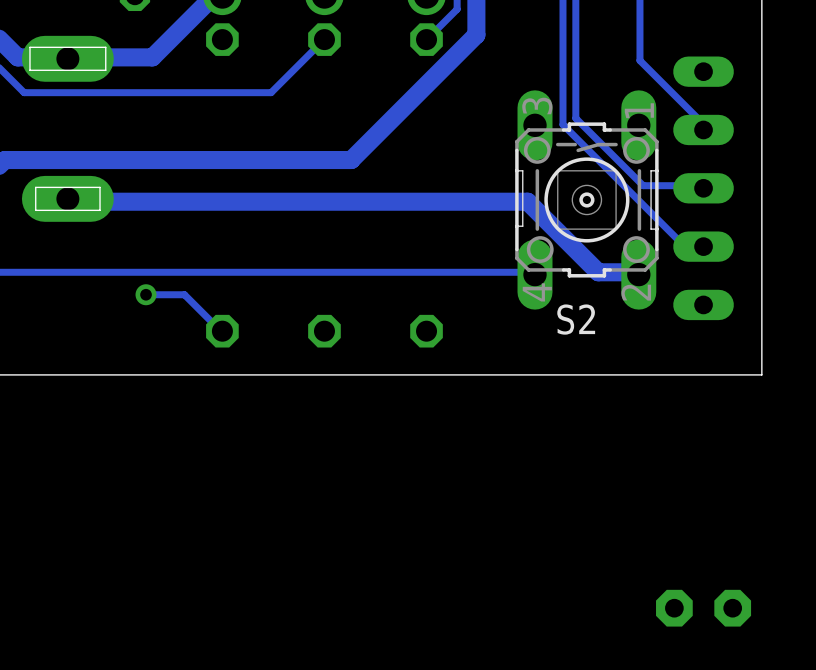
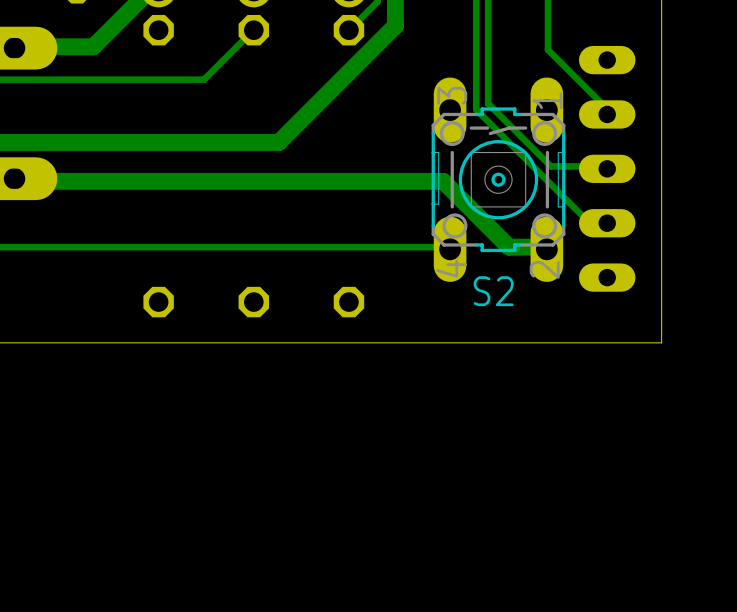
track: (146, 294) (184, 294) (222, 331) -> none
via: (146, 294) -> none
part: (703, 608) -> none

